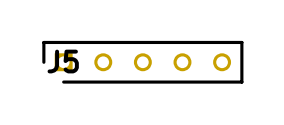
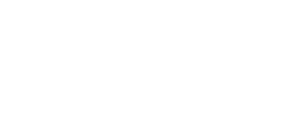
J5: (142, 62) -> none

